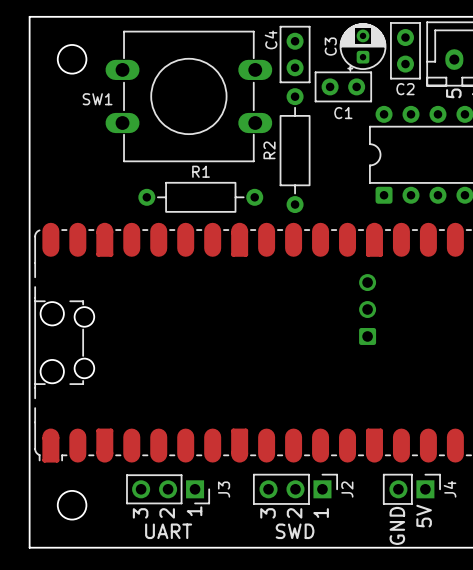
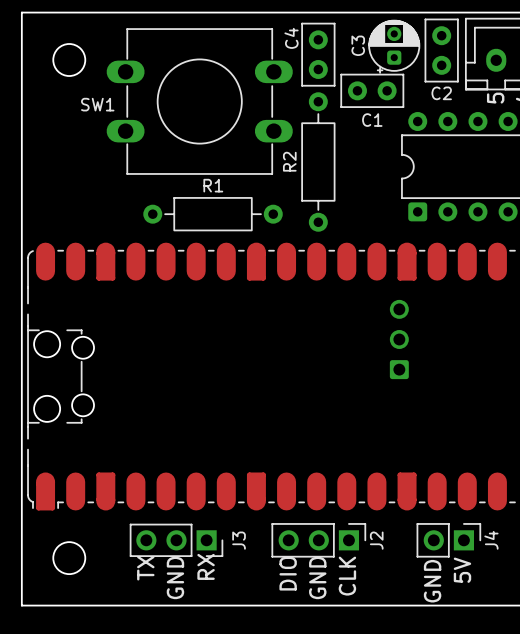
text: 1 (194, 511) -> RX (206, 566)
text: 3 (140, 513) -> TX (145, 568)
text: 2 (167, 513) -> GND (175, 577)
text: 3 (268, 513) -> DIO (288, 573)
text: 2 (294, 513) -> GND (317, 577)
text: 1 (321, 513) -> CLK (347, 576)
text: UART (168, 531) -> none
text: SWD (295, 531) -> none

